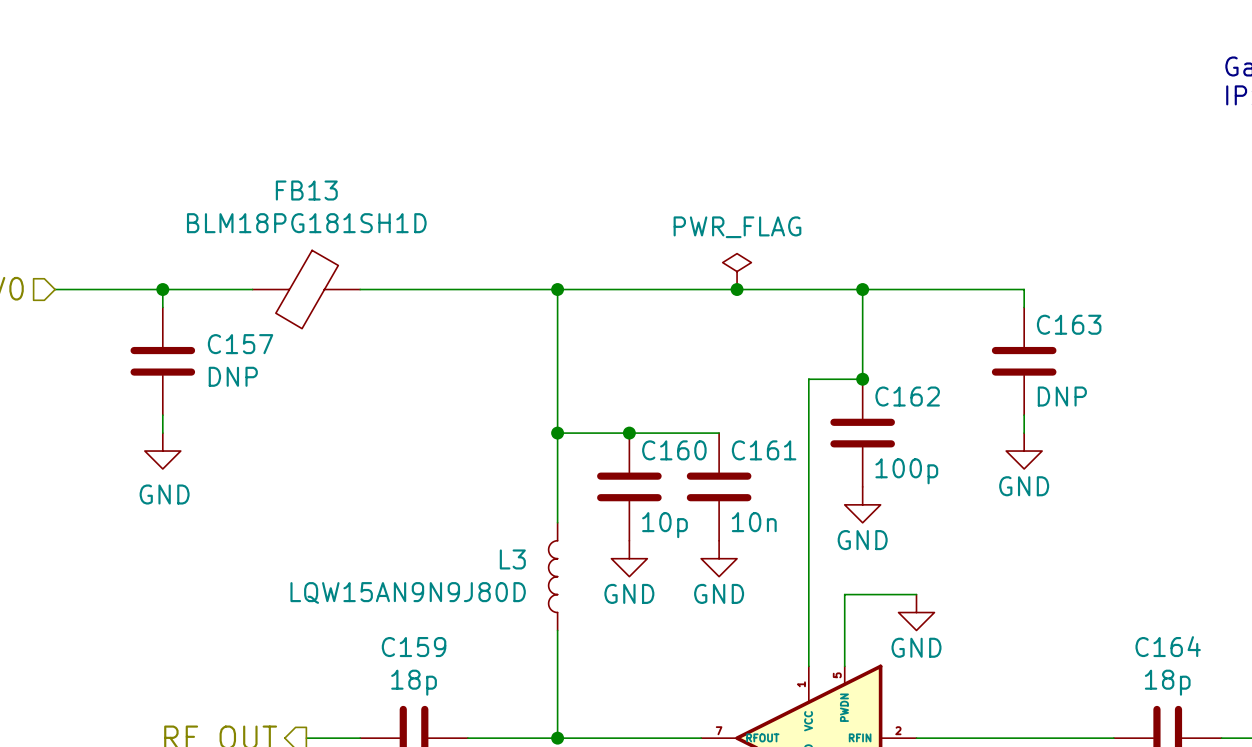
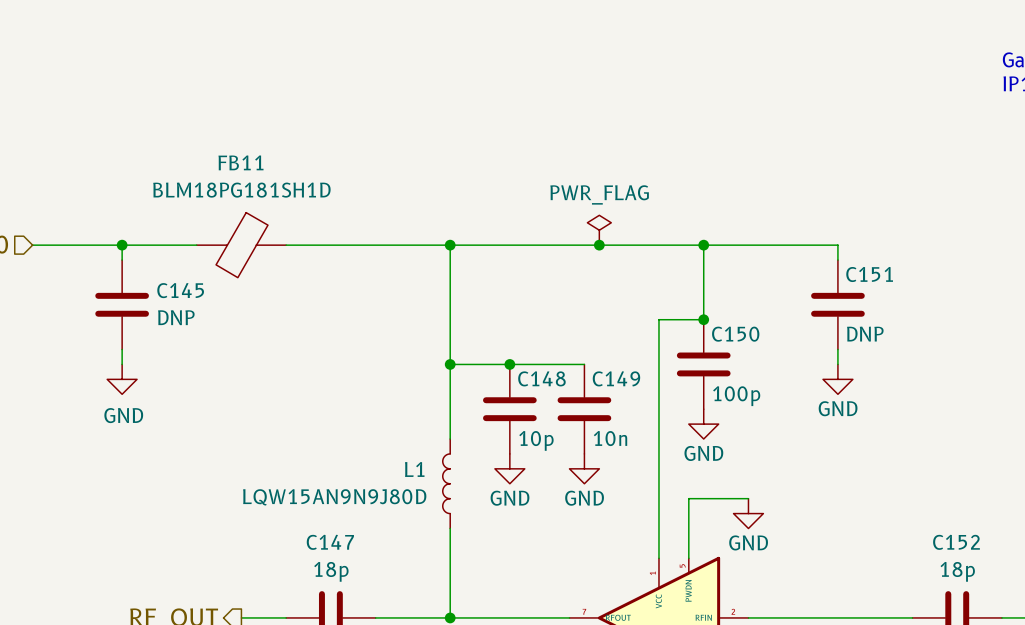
FB13 name: FB13 (306, 190) -> FB11 (240, 162)
C163 name: C163 (1069, 324) -> C151 (869, 274)
C157 name: C157 (240, 344) -> C145 (180, 290)
C162 name: C162 (907, 396) -> C150 (735, 334)
C160 name: C160 (674, 450) -> C148 (541, 378)
C161 name: C161 (764, 450) -> C149 (616, 378)
L3 name: L3 (512, 559) -> L1 (414, 469)
C164 name: C164 (1168, 646) -> C152 (956, 542)
C159 name: C159 (414, 647) -> C147 (330, 542)

